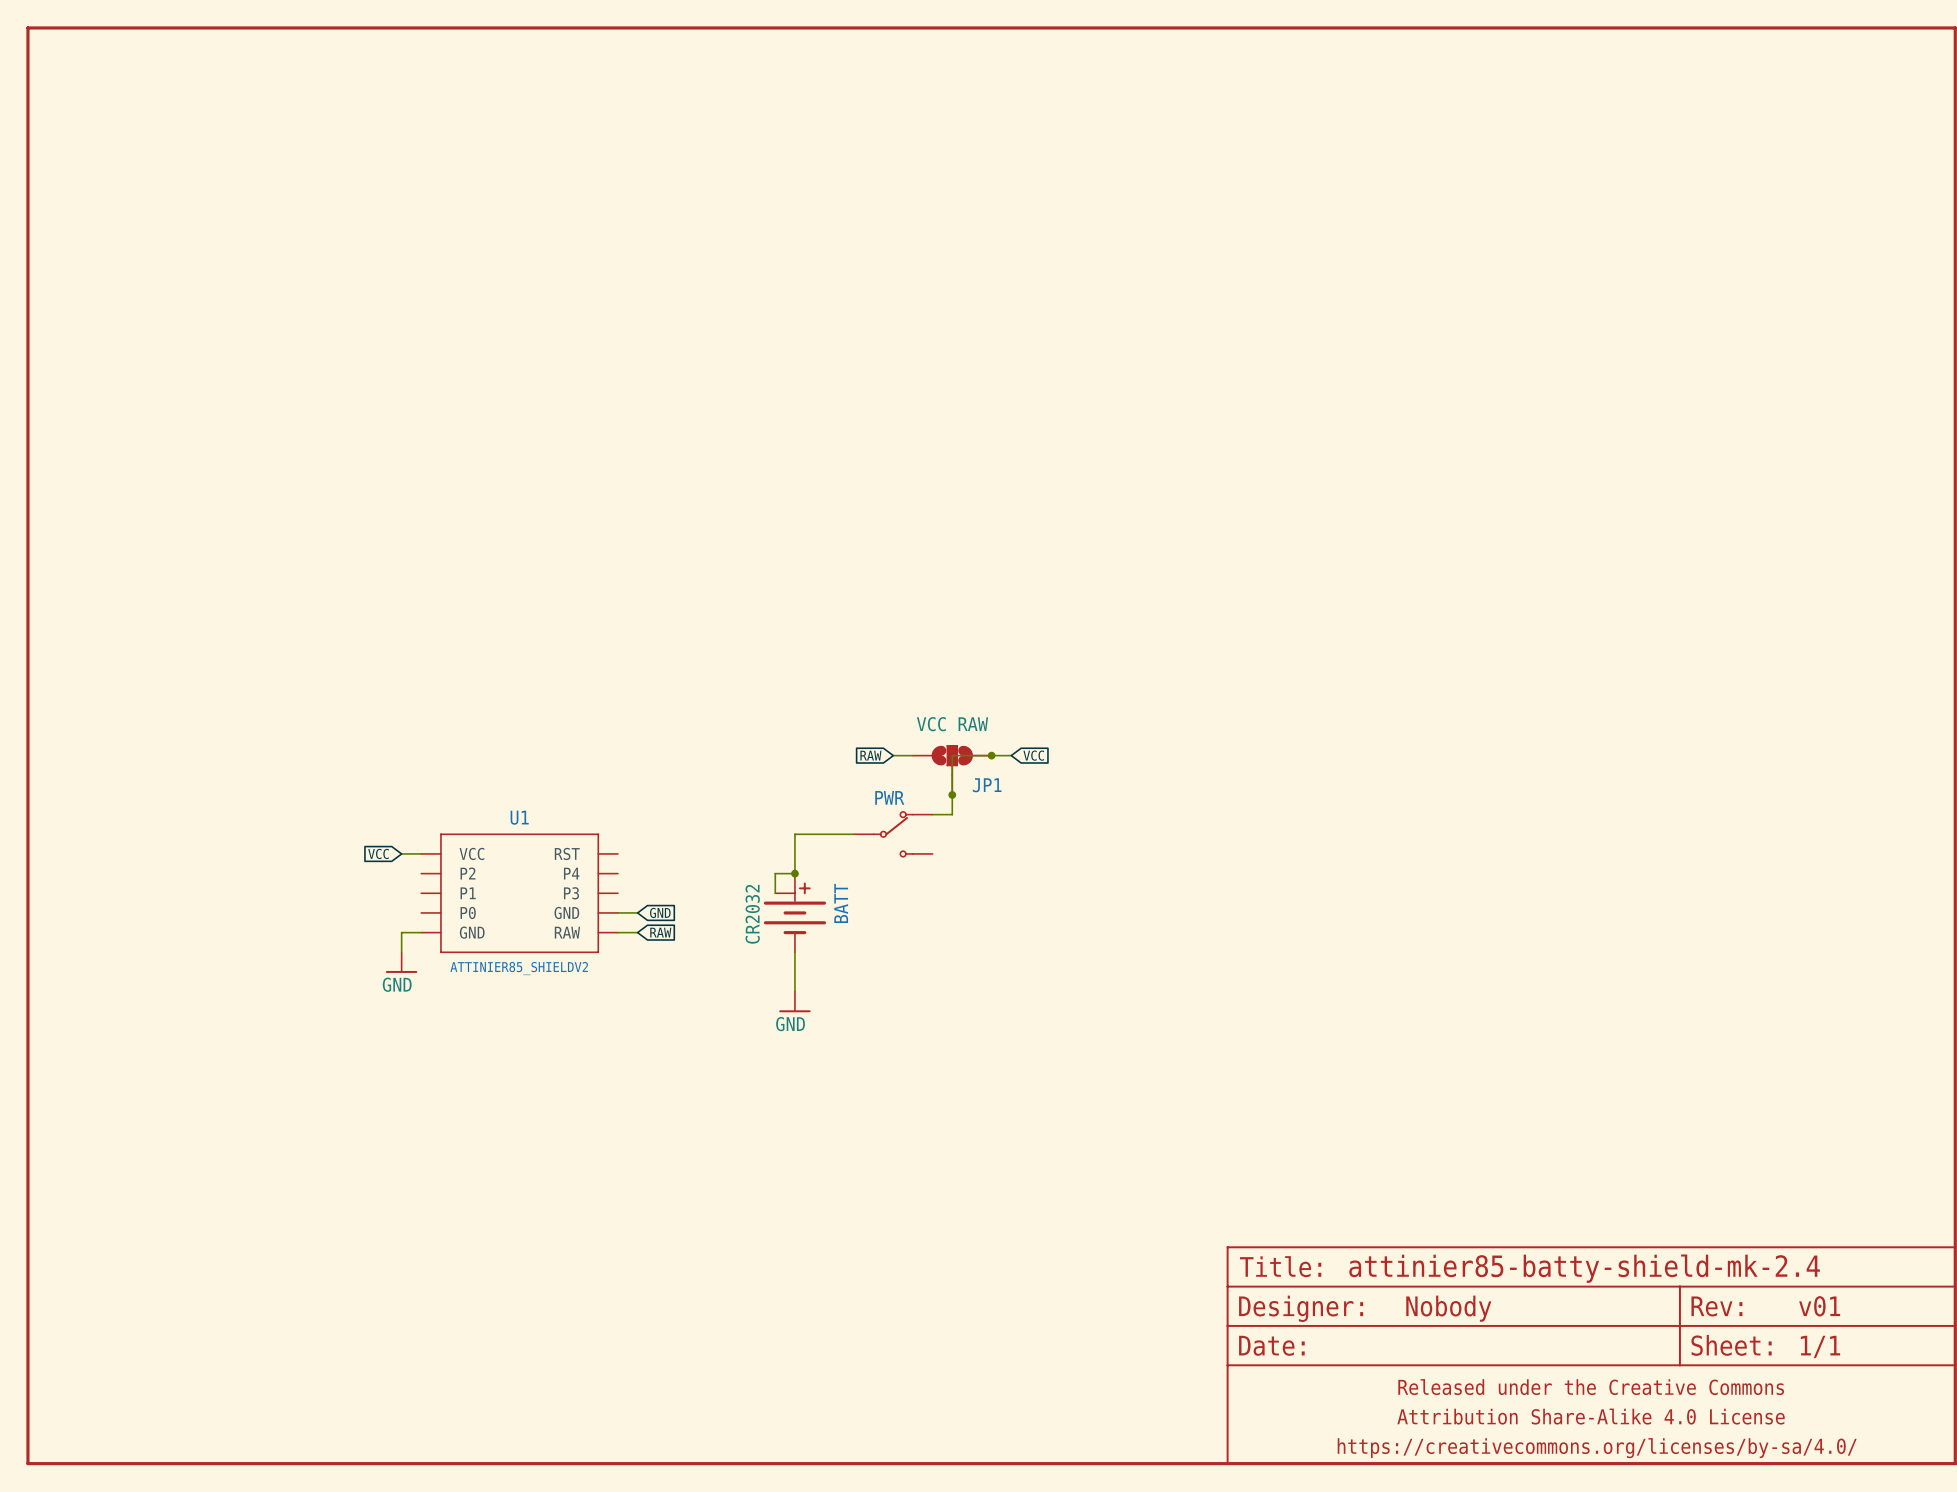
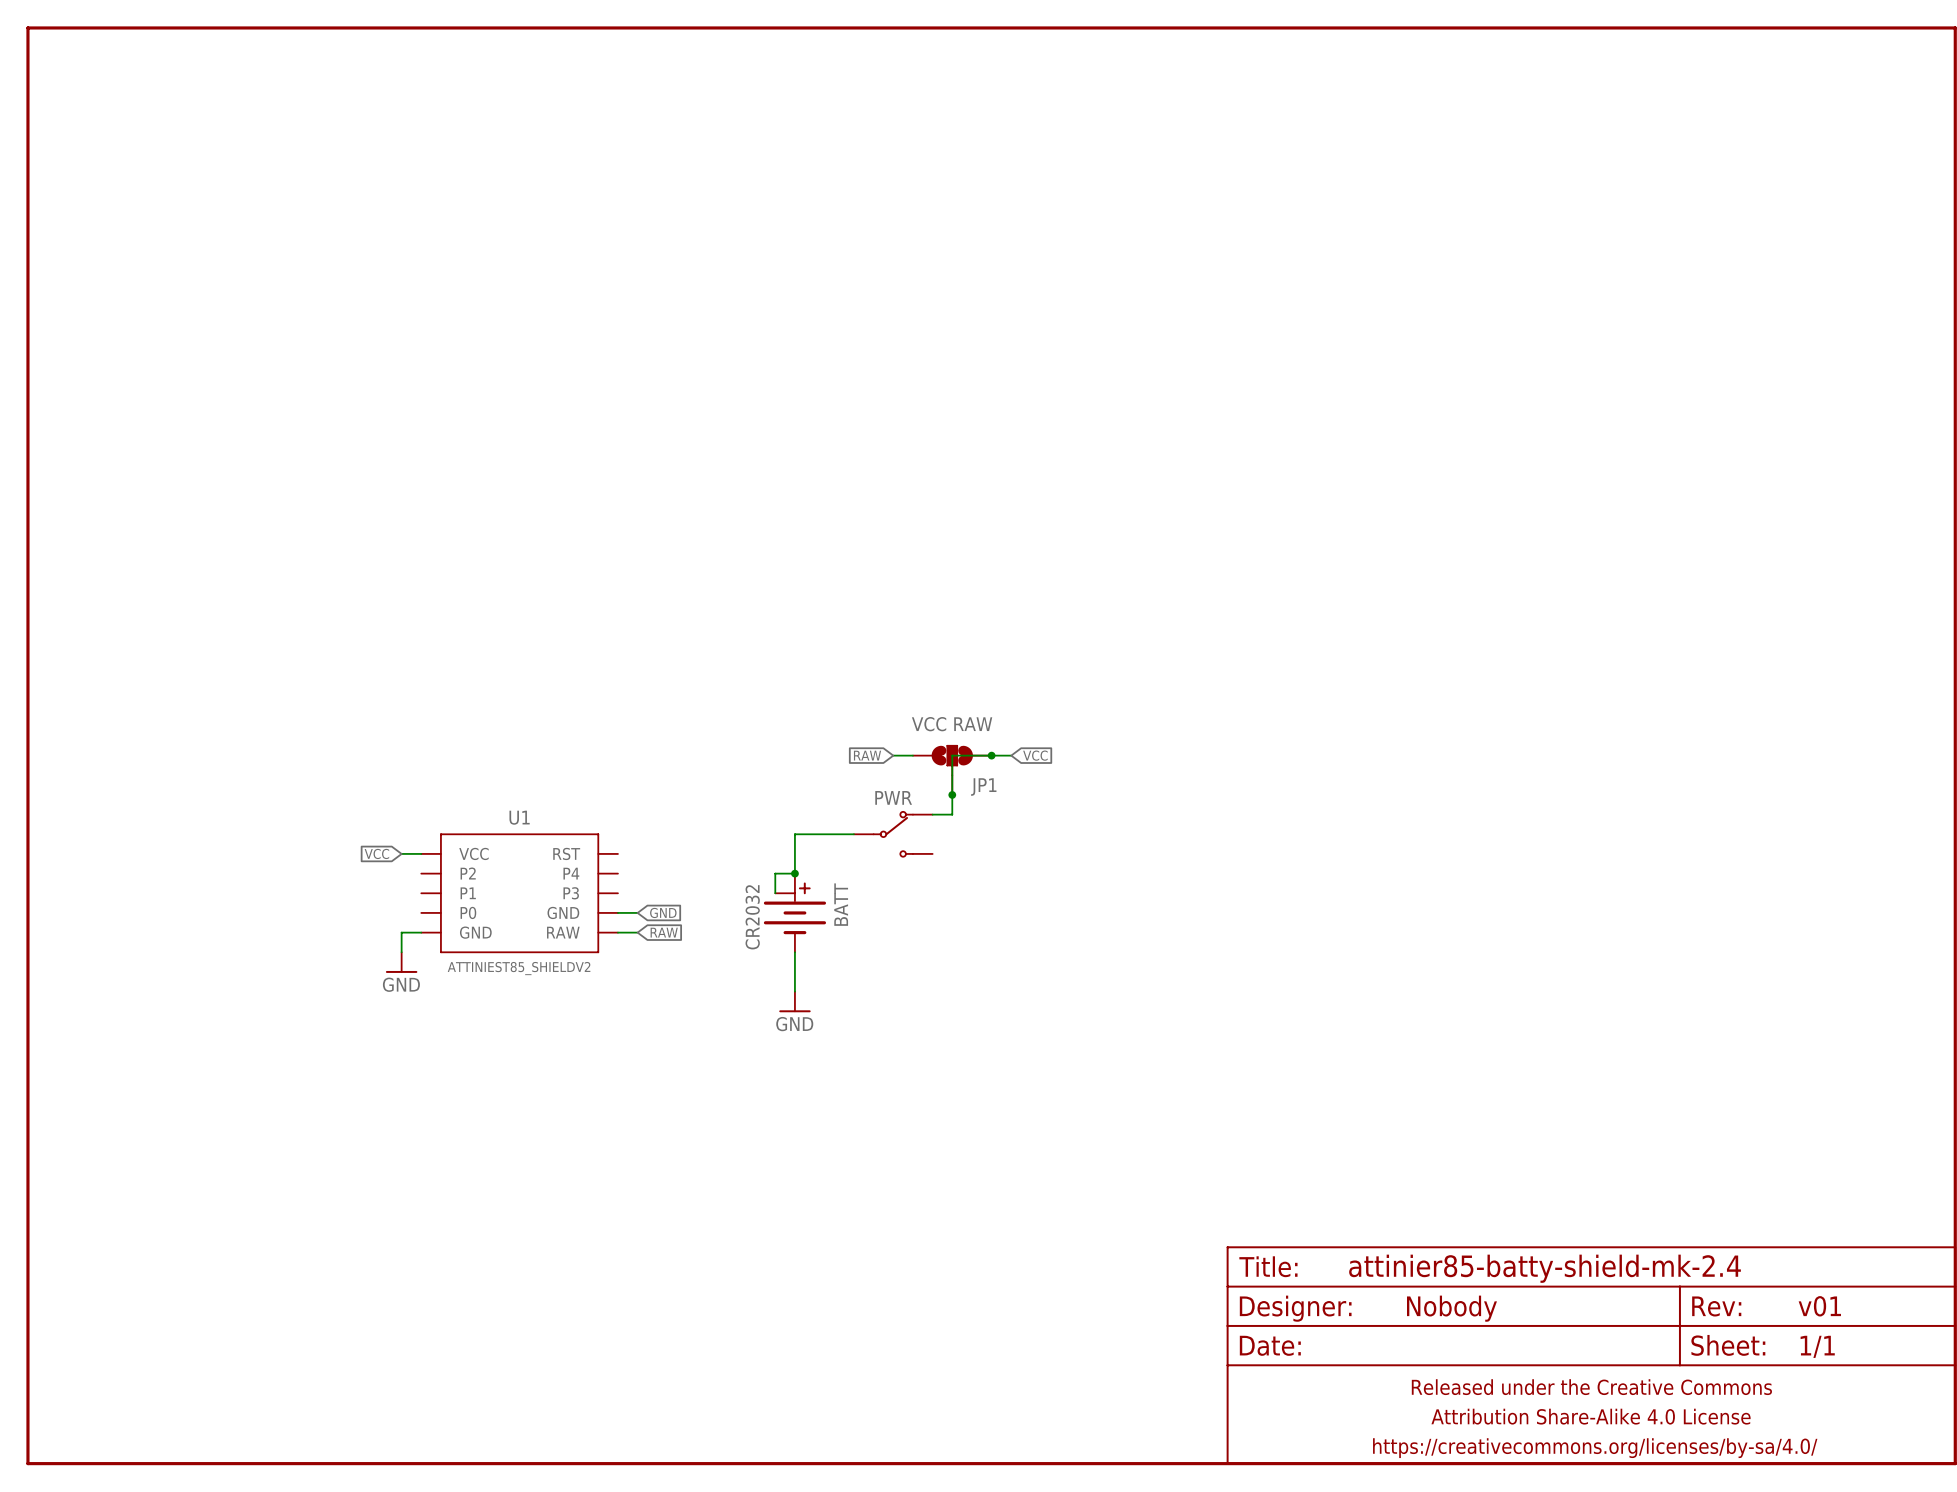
U1 value: ATTINIER85_SHIELDV2 (519, 968) -> ATTINIEST85_SHIELDV2 (519, 968)

